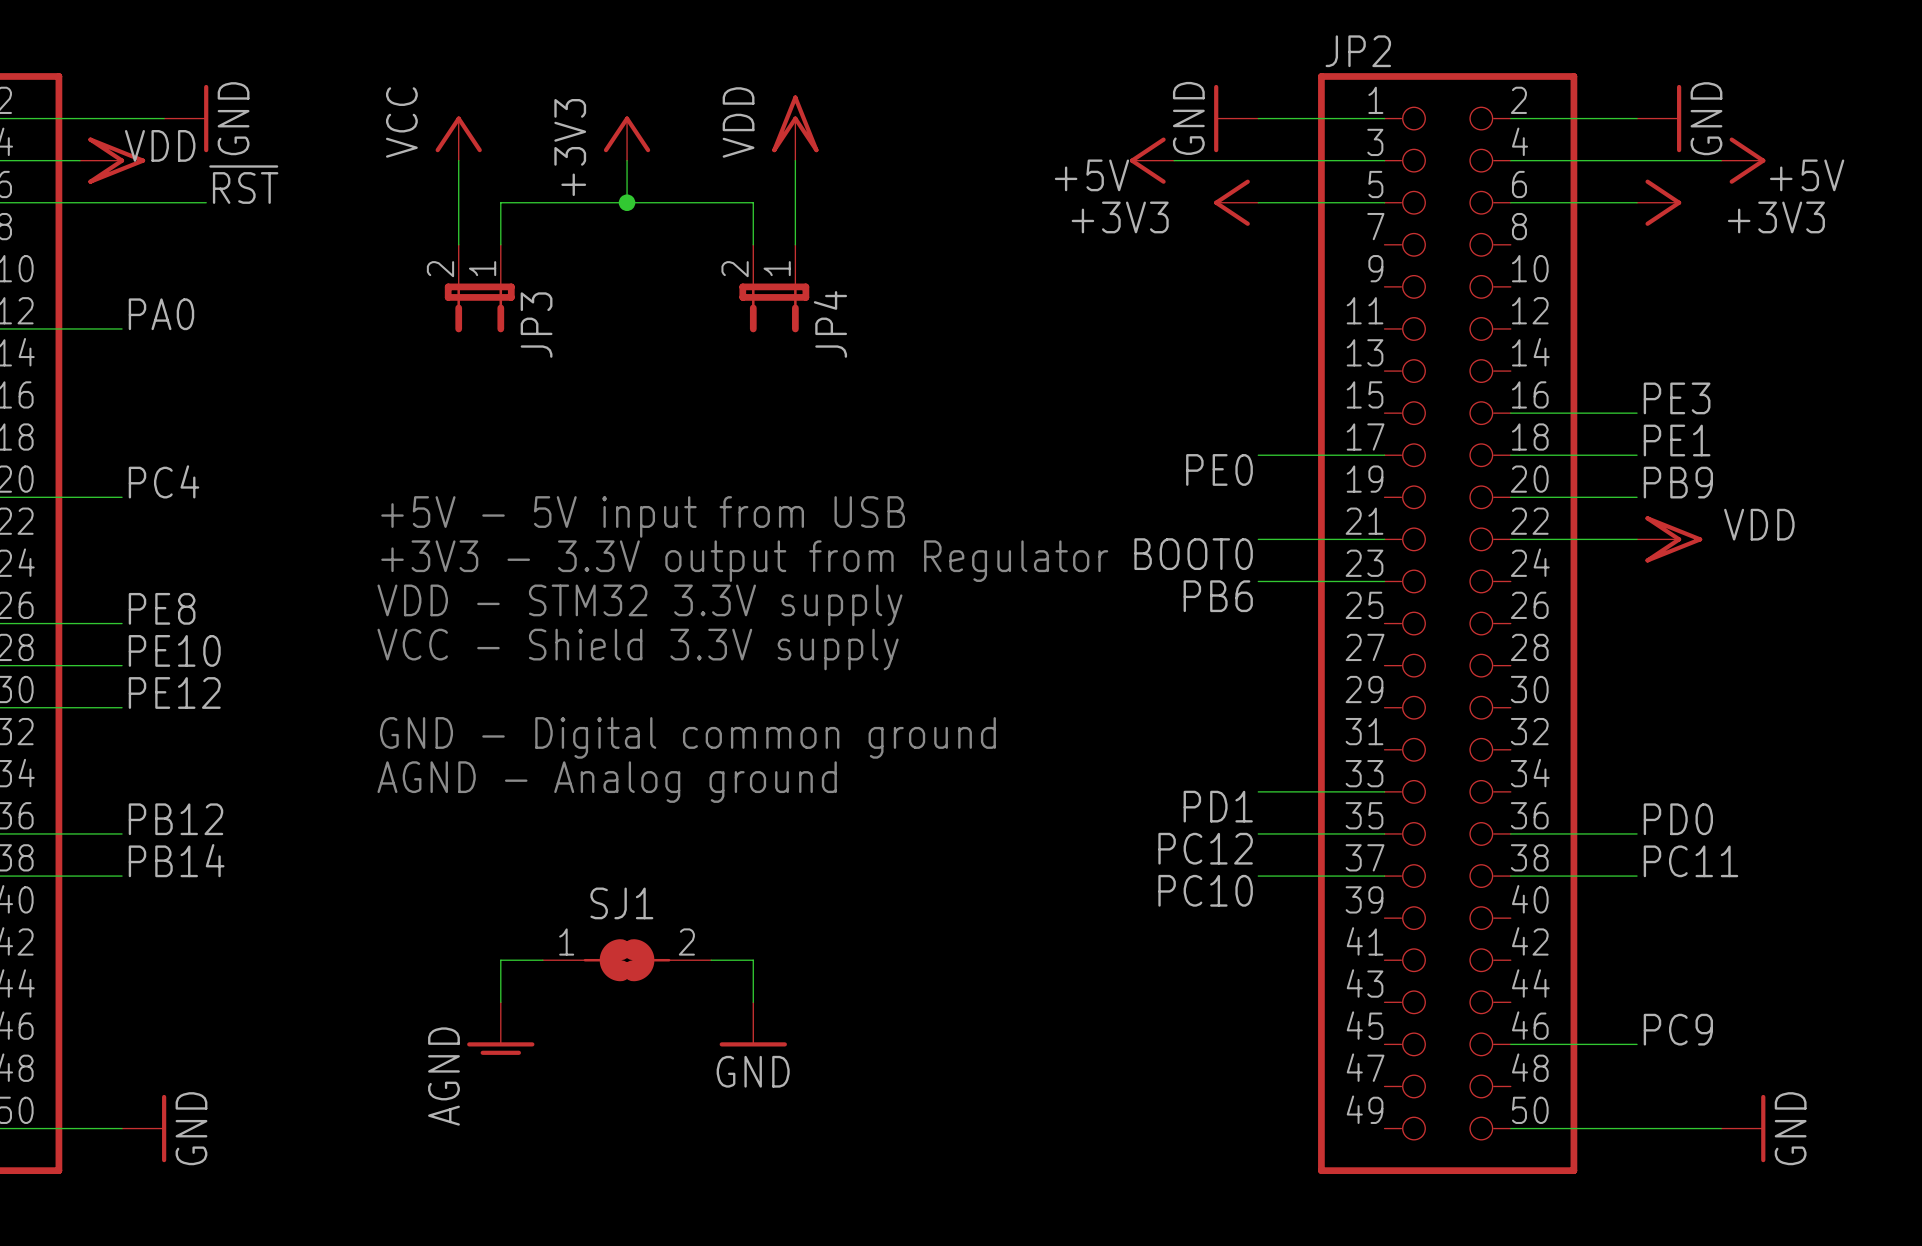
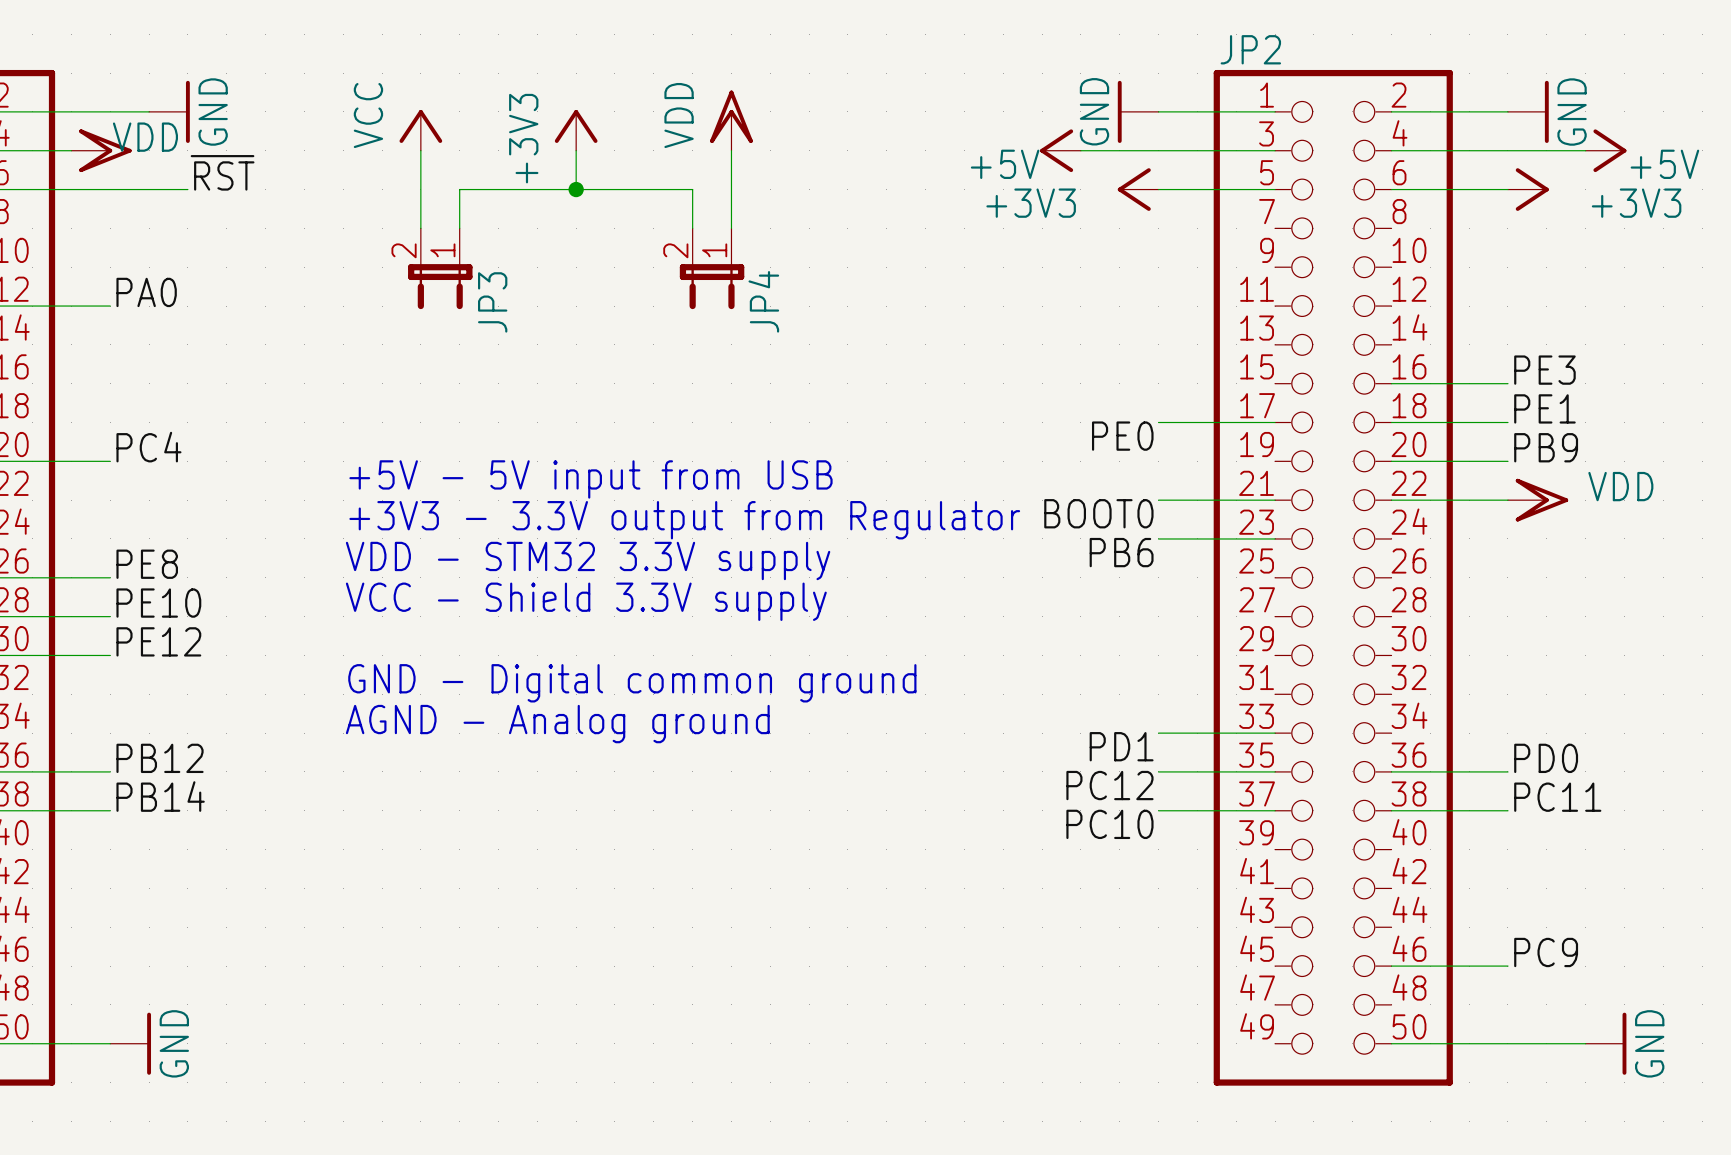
wire: (542, 960) (500, 960) (500, 1002) -> none
SJ1: (627, 960) -> none
wire: (711, 960) (753, 960) (753, 1002) -> none
power symbol: GND (753, 1024) -> none
power symbol: AGND (500, 1028) -> none

